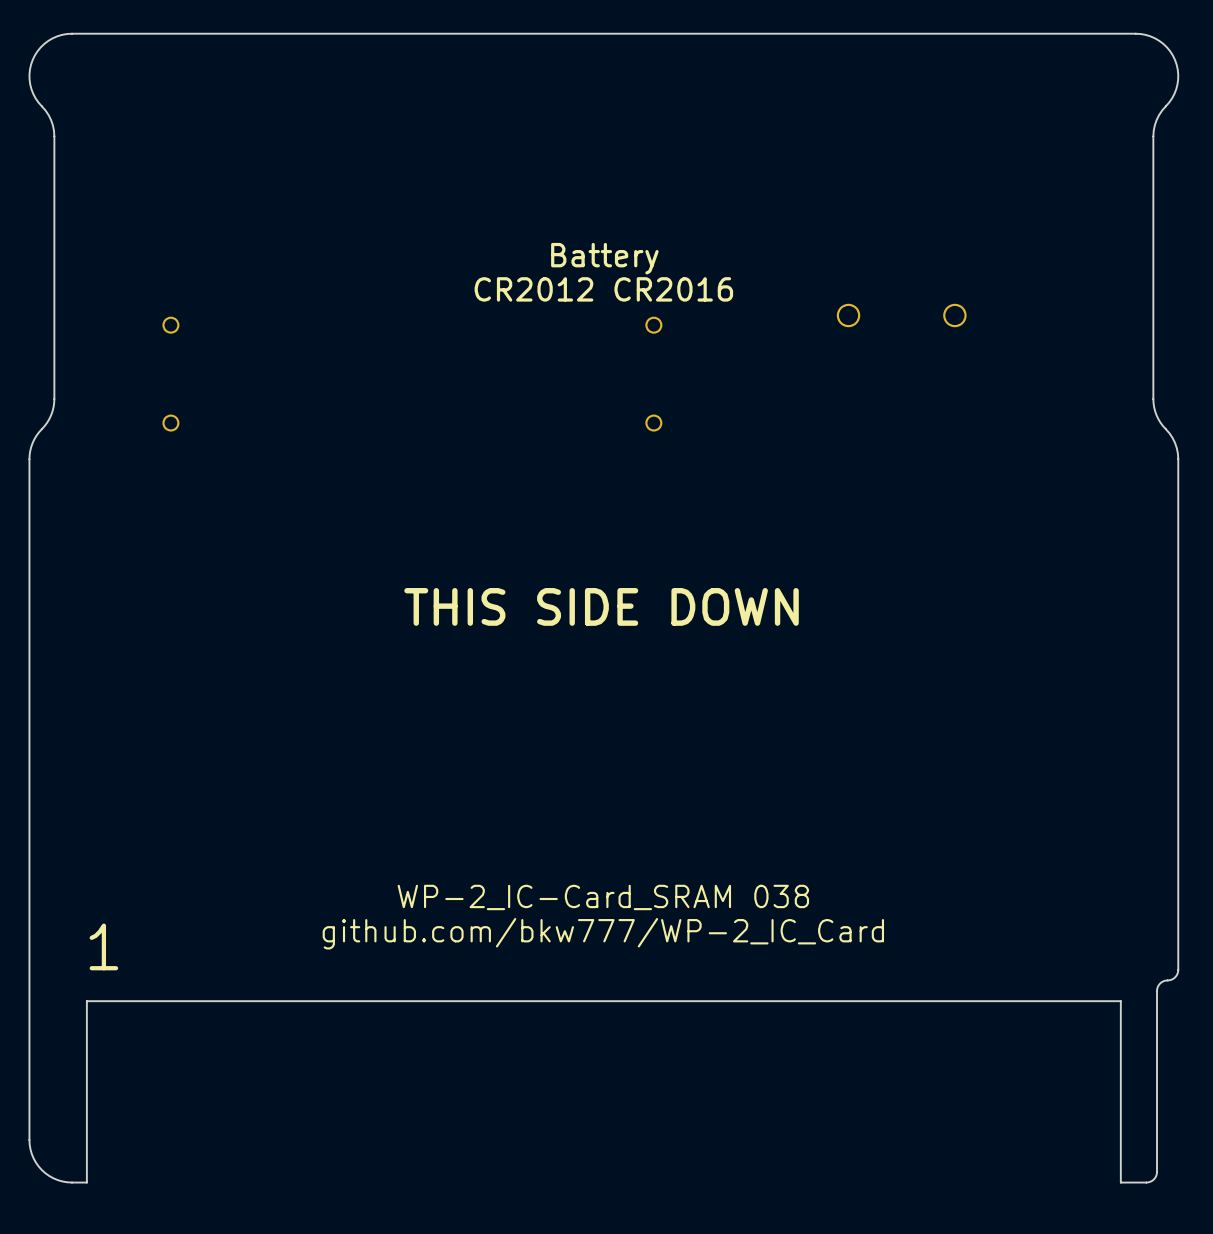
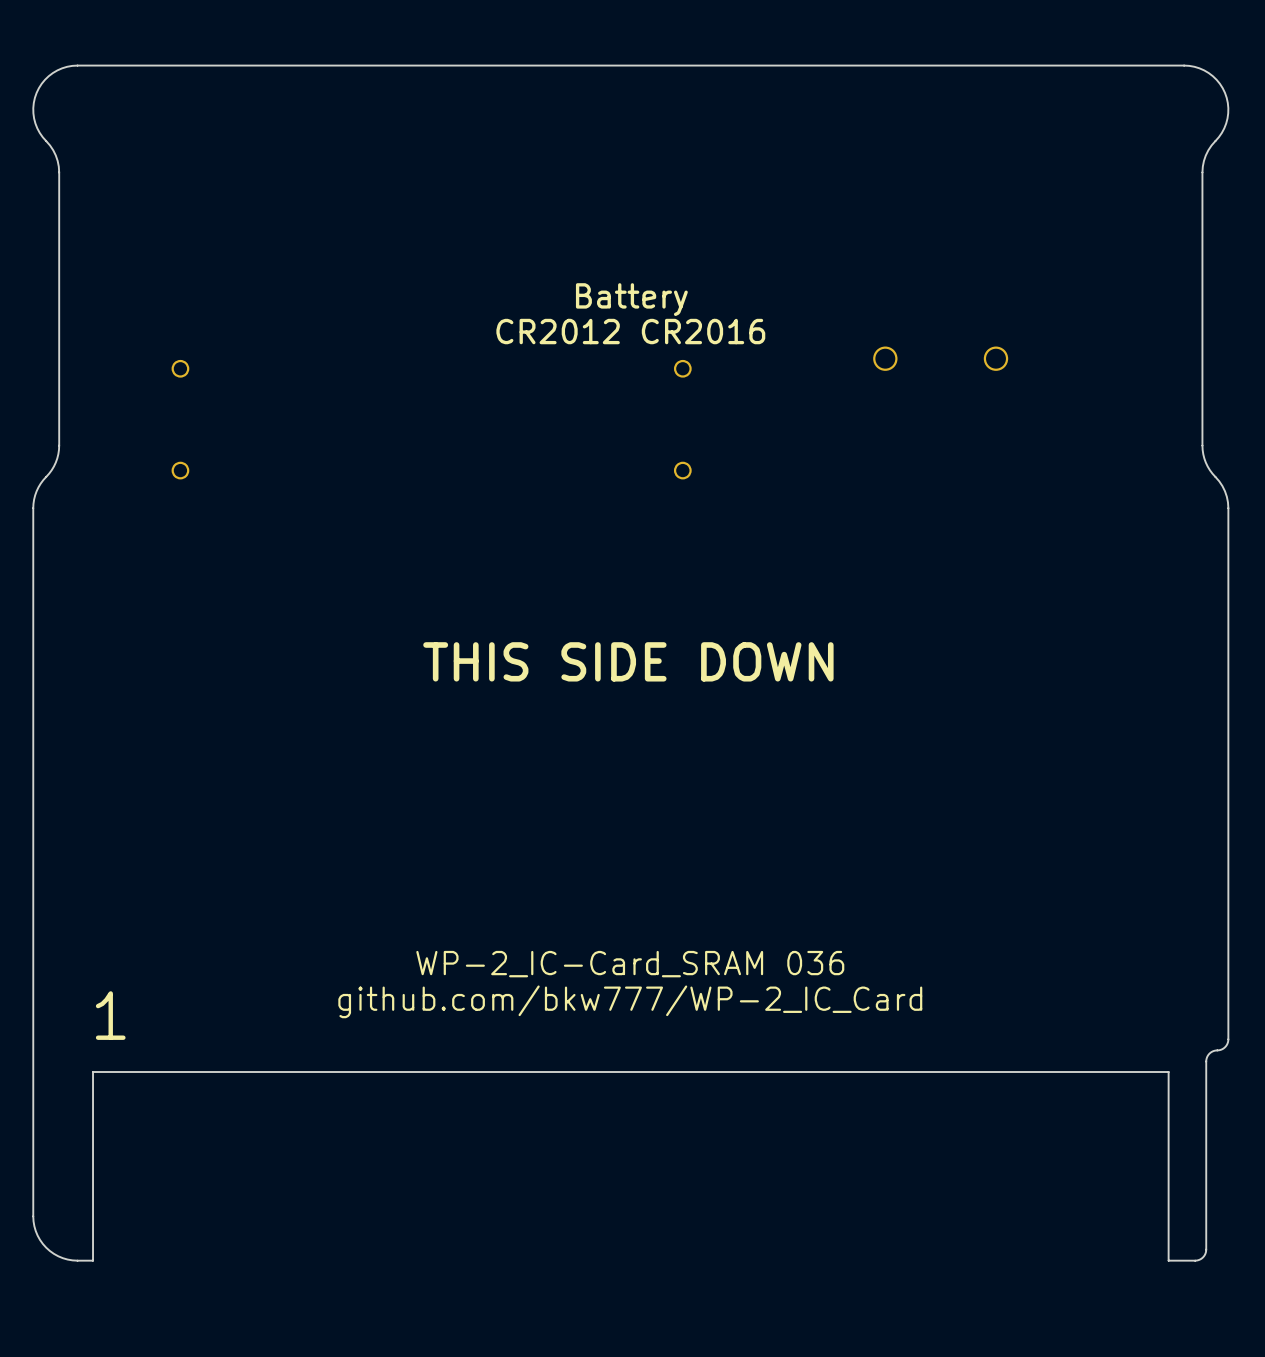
text: WP-2_IC-Card_SRAM 038 (603, 897) -> WP-2_IC-Card_SRAM 036 (630, 964)

